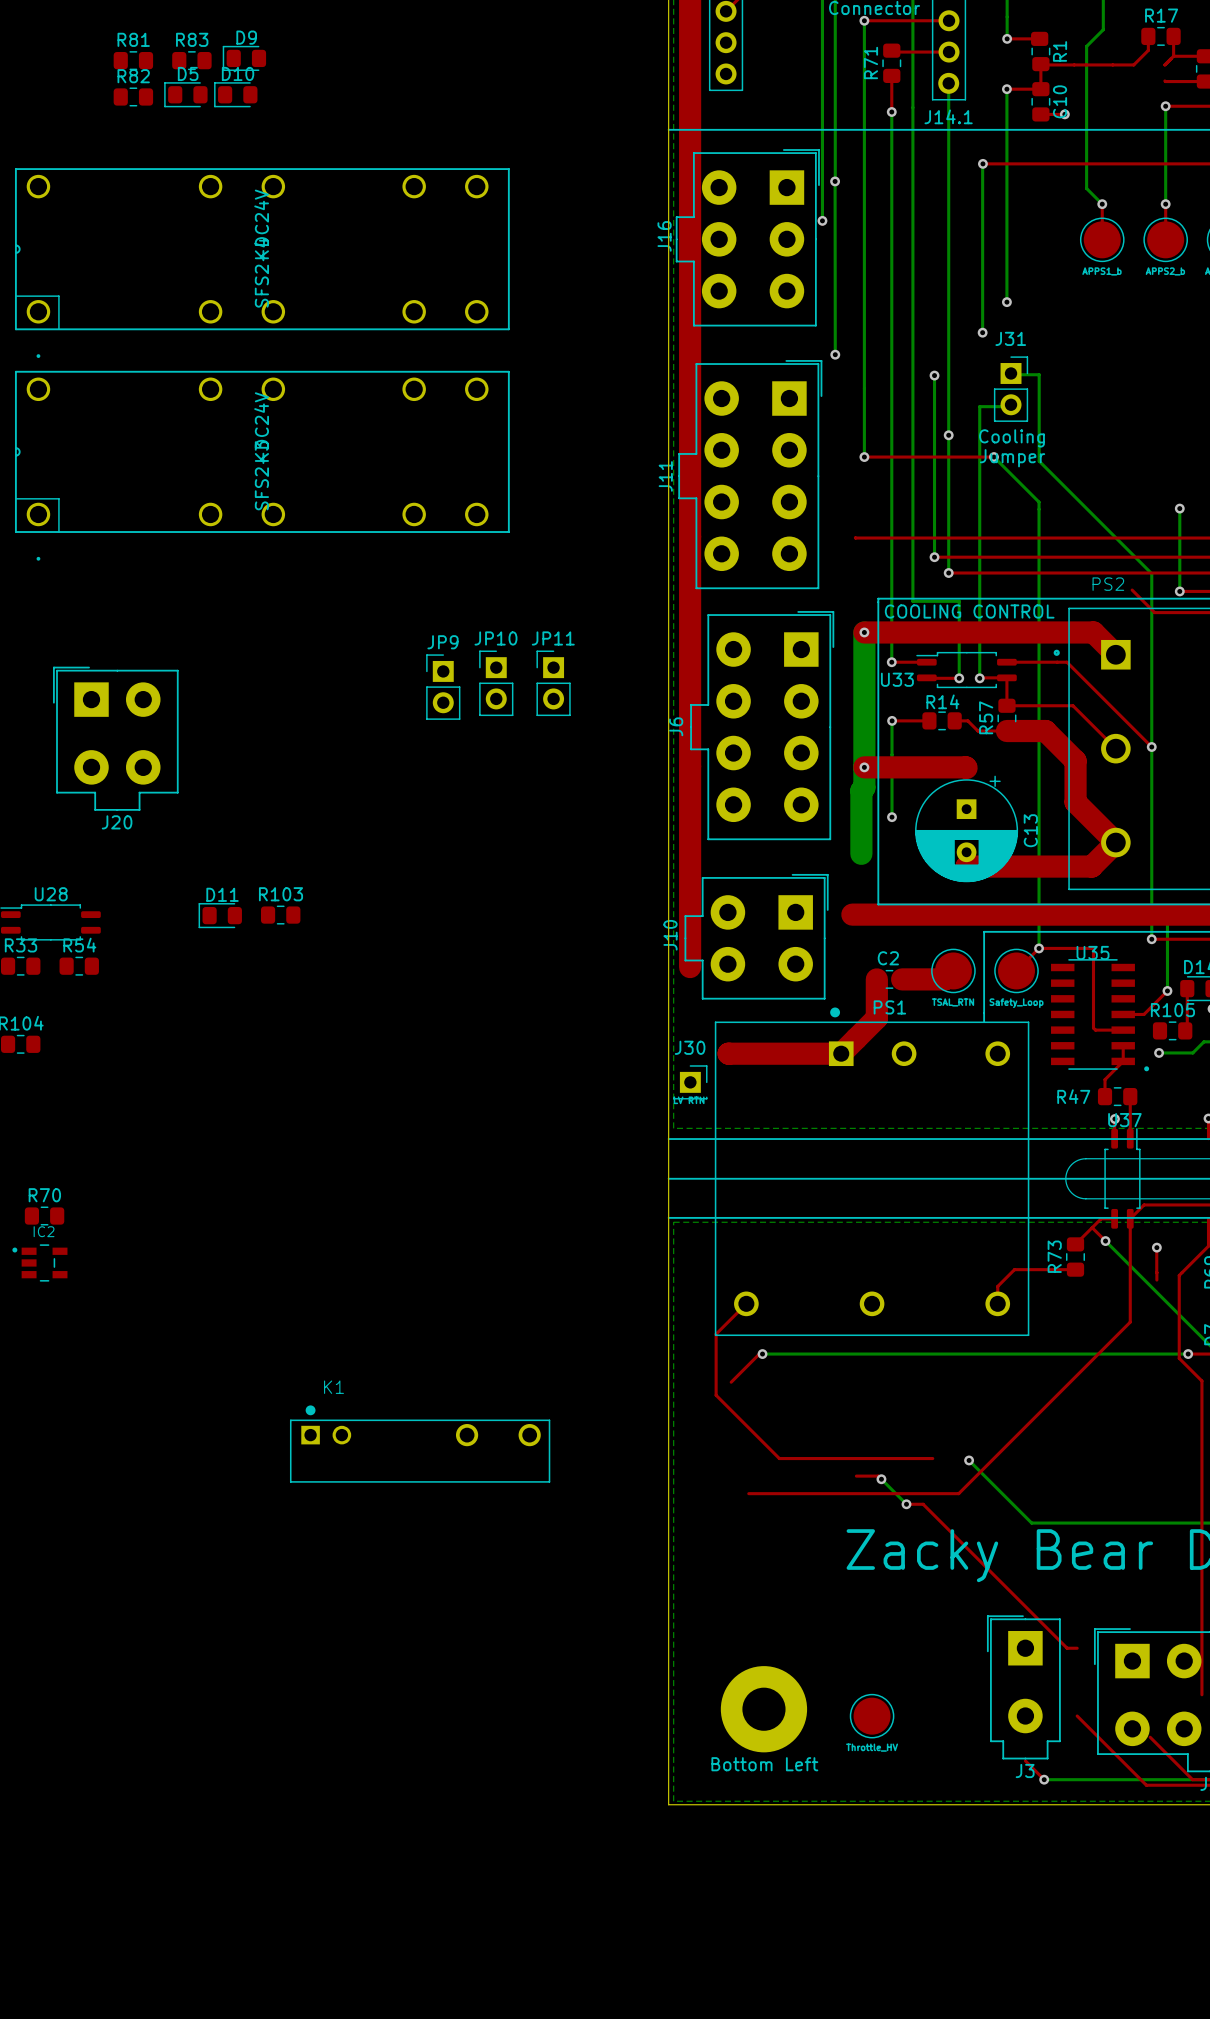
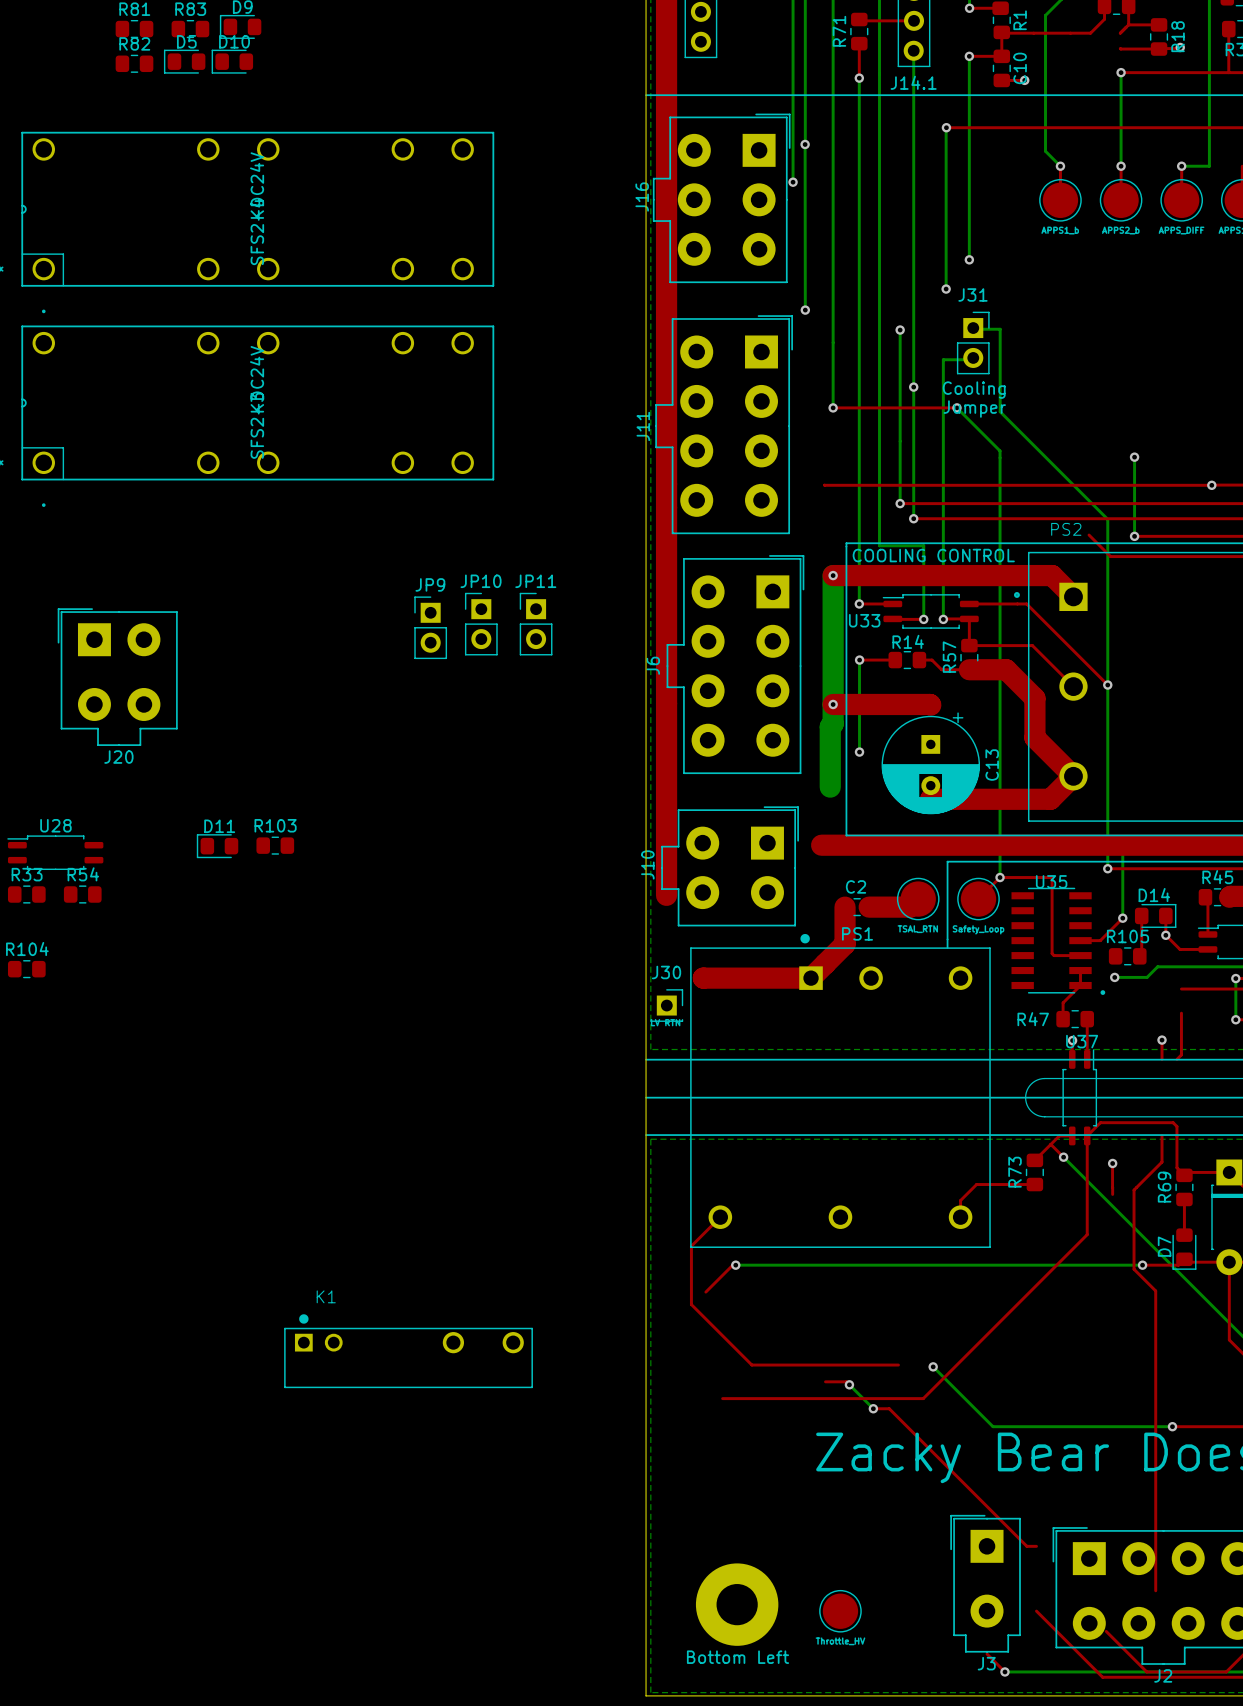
R70: (44, 1216) -> none
IC2: (39, 1262) -> none

